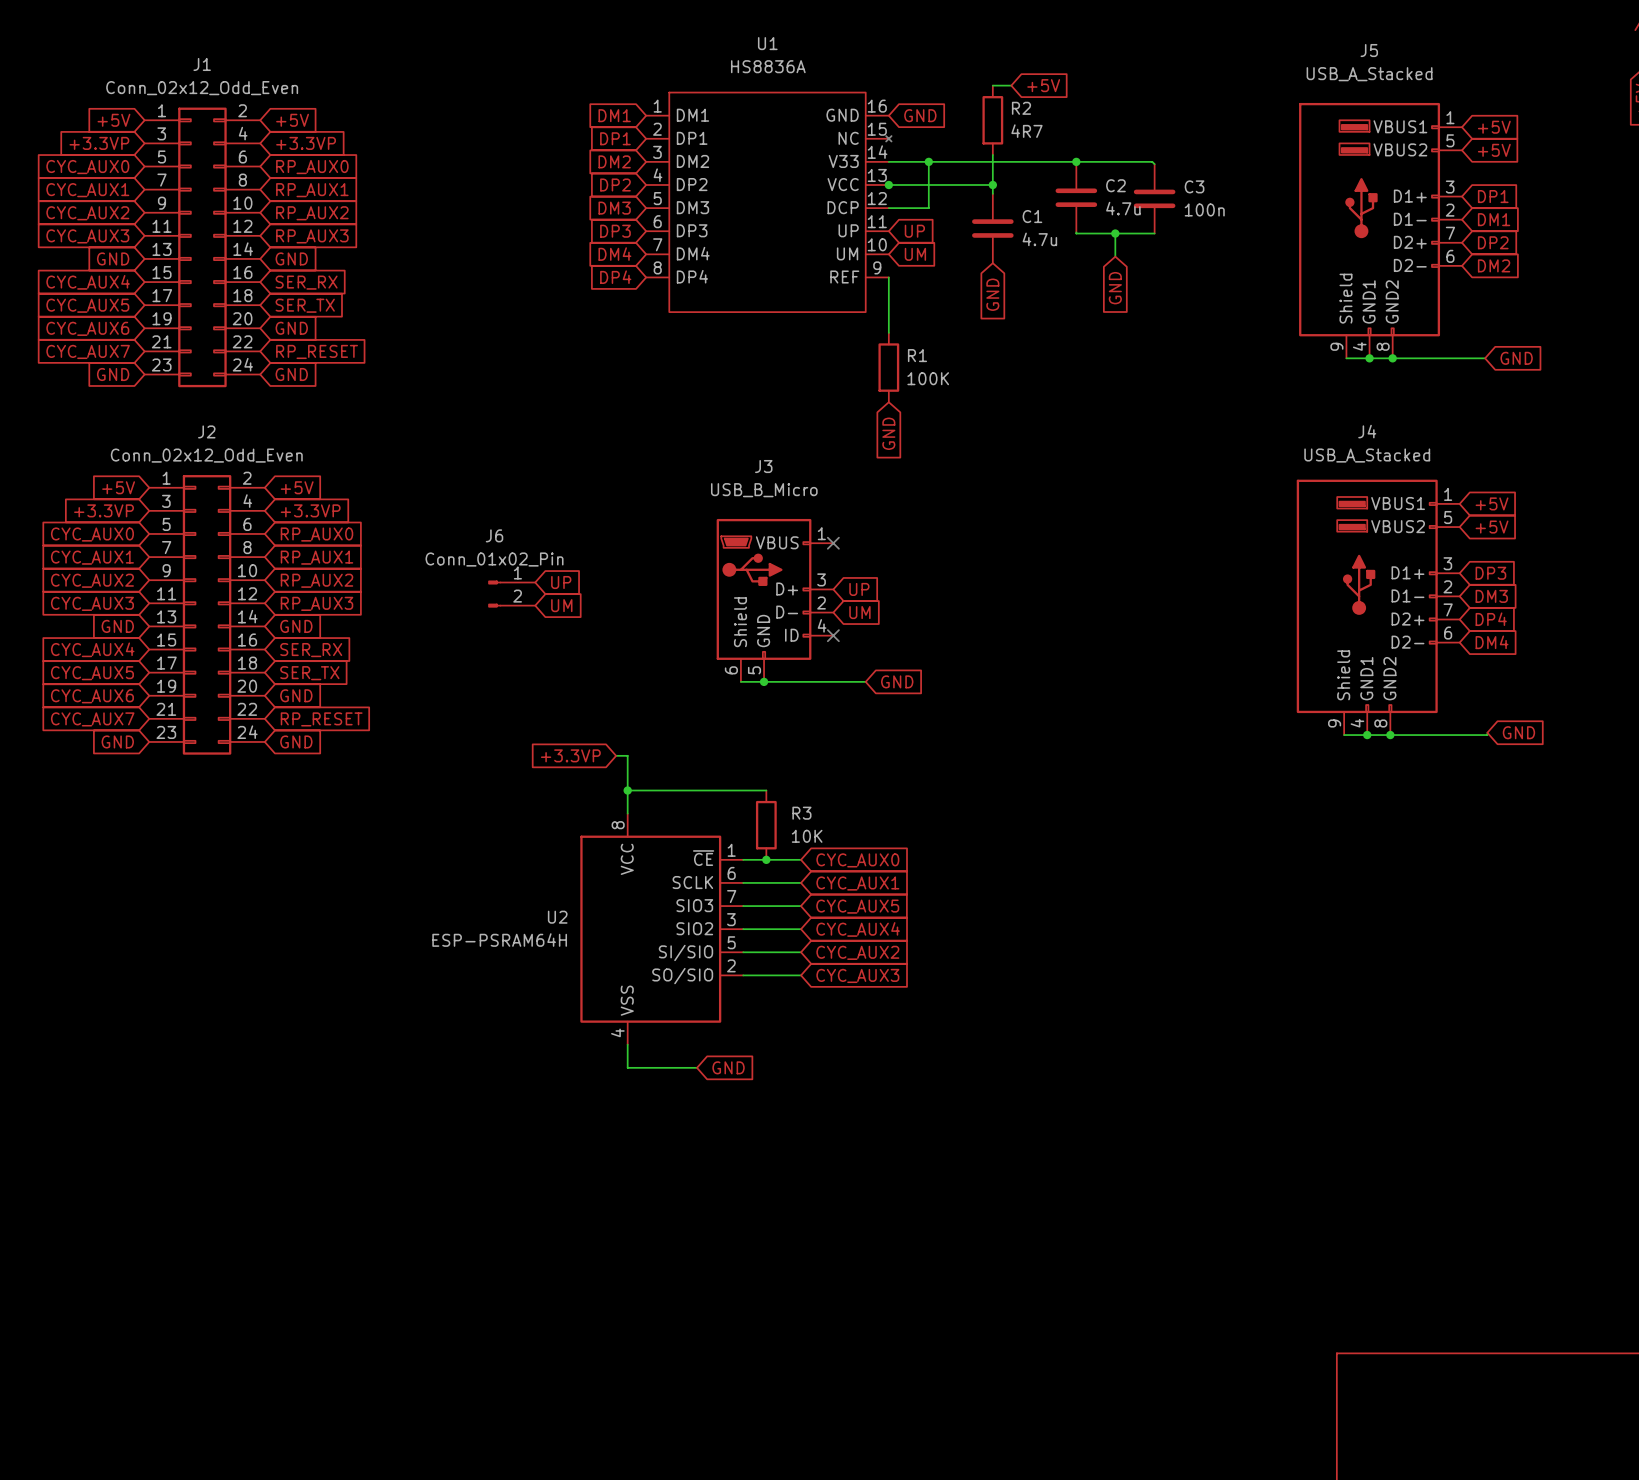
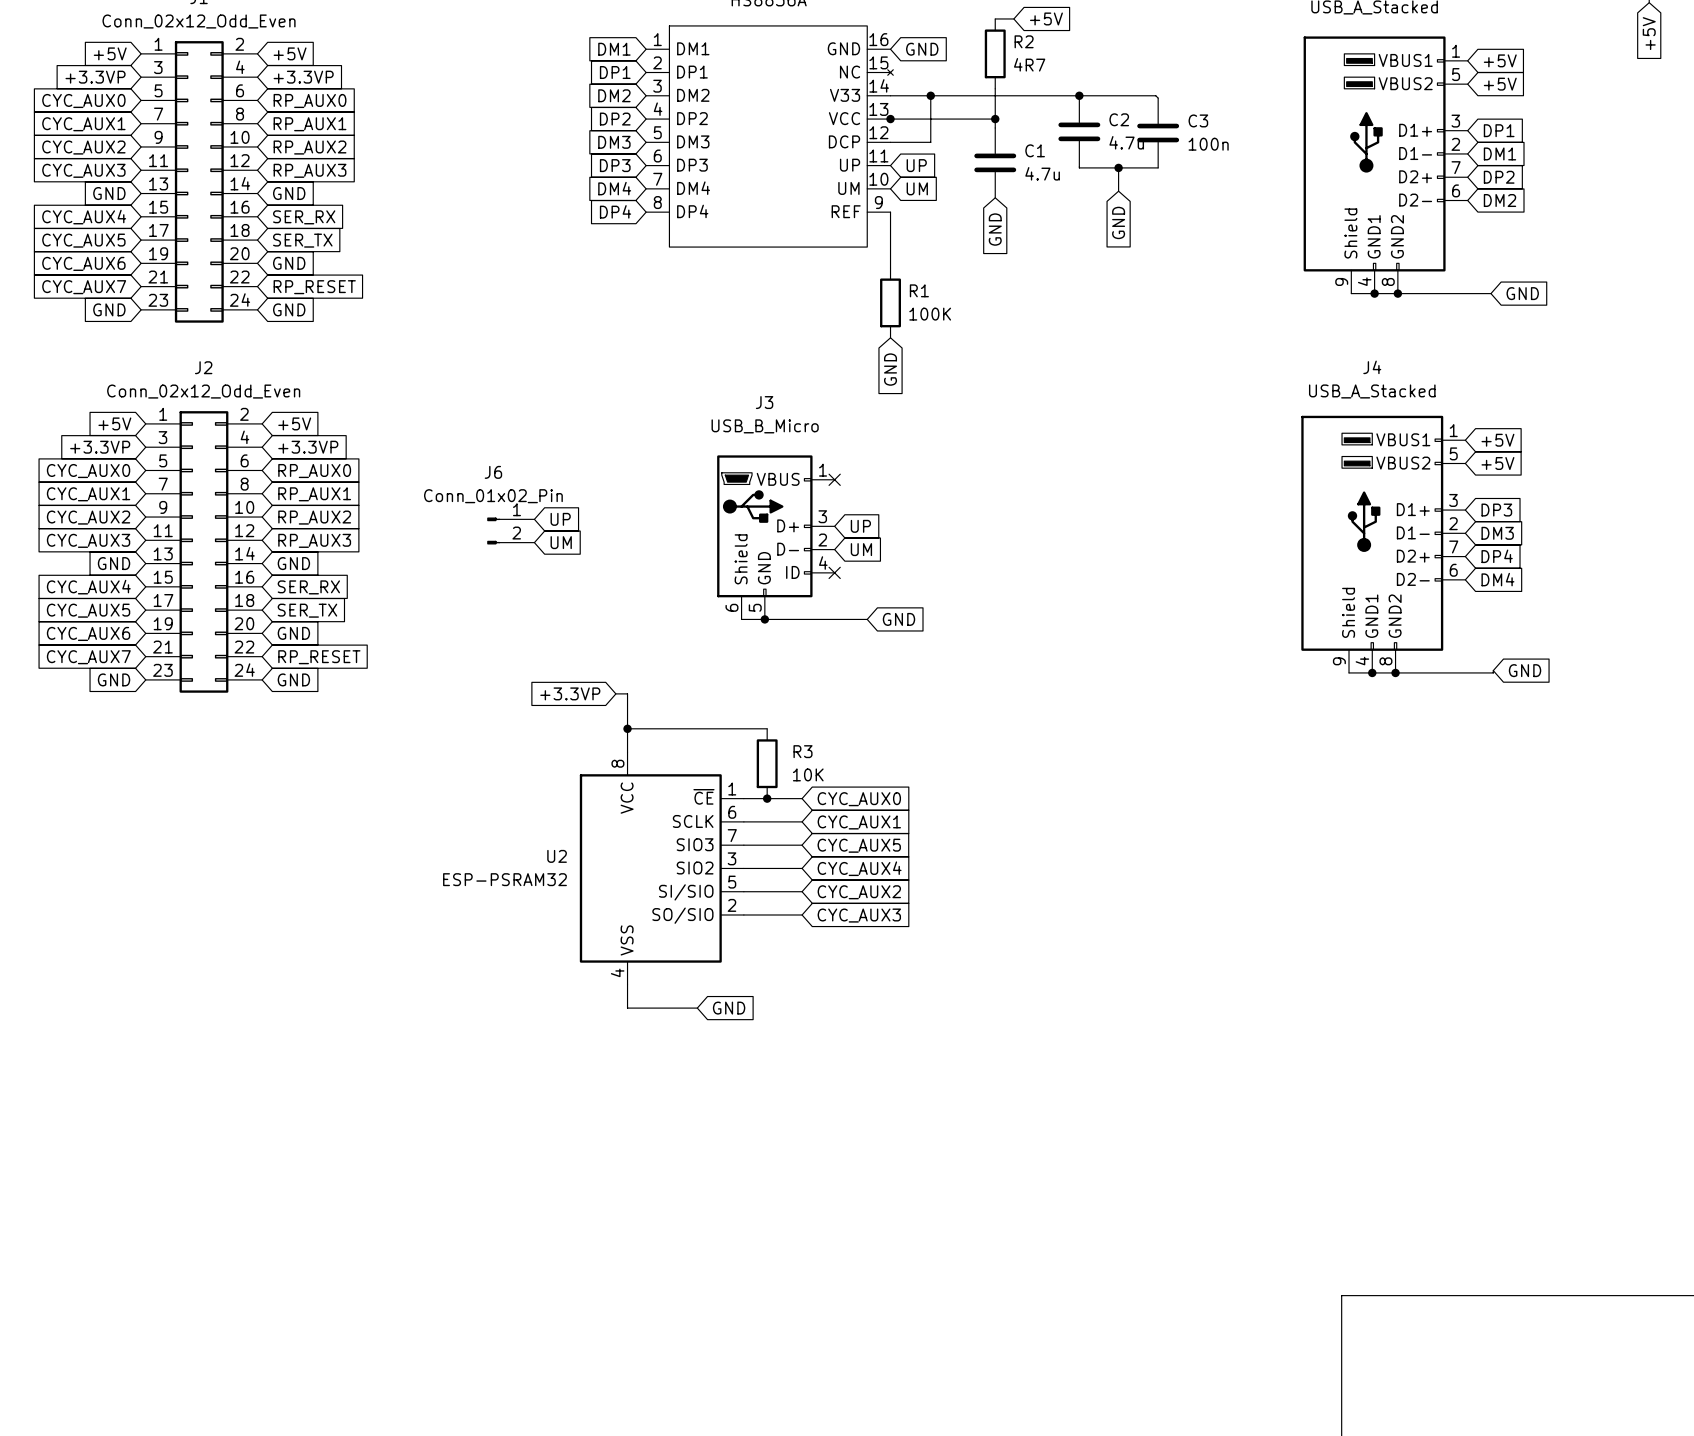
U2 value: ESP-PSRAM64H (499, 940) -> ESP-PSRAM32 (504, 879)

